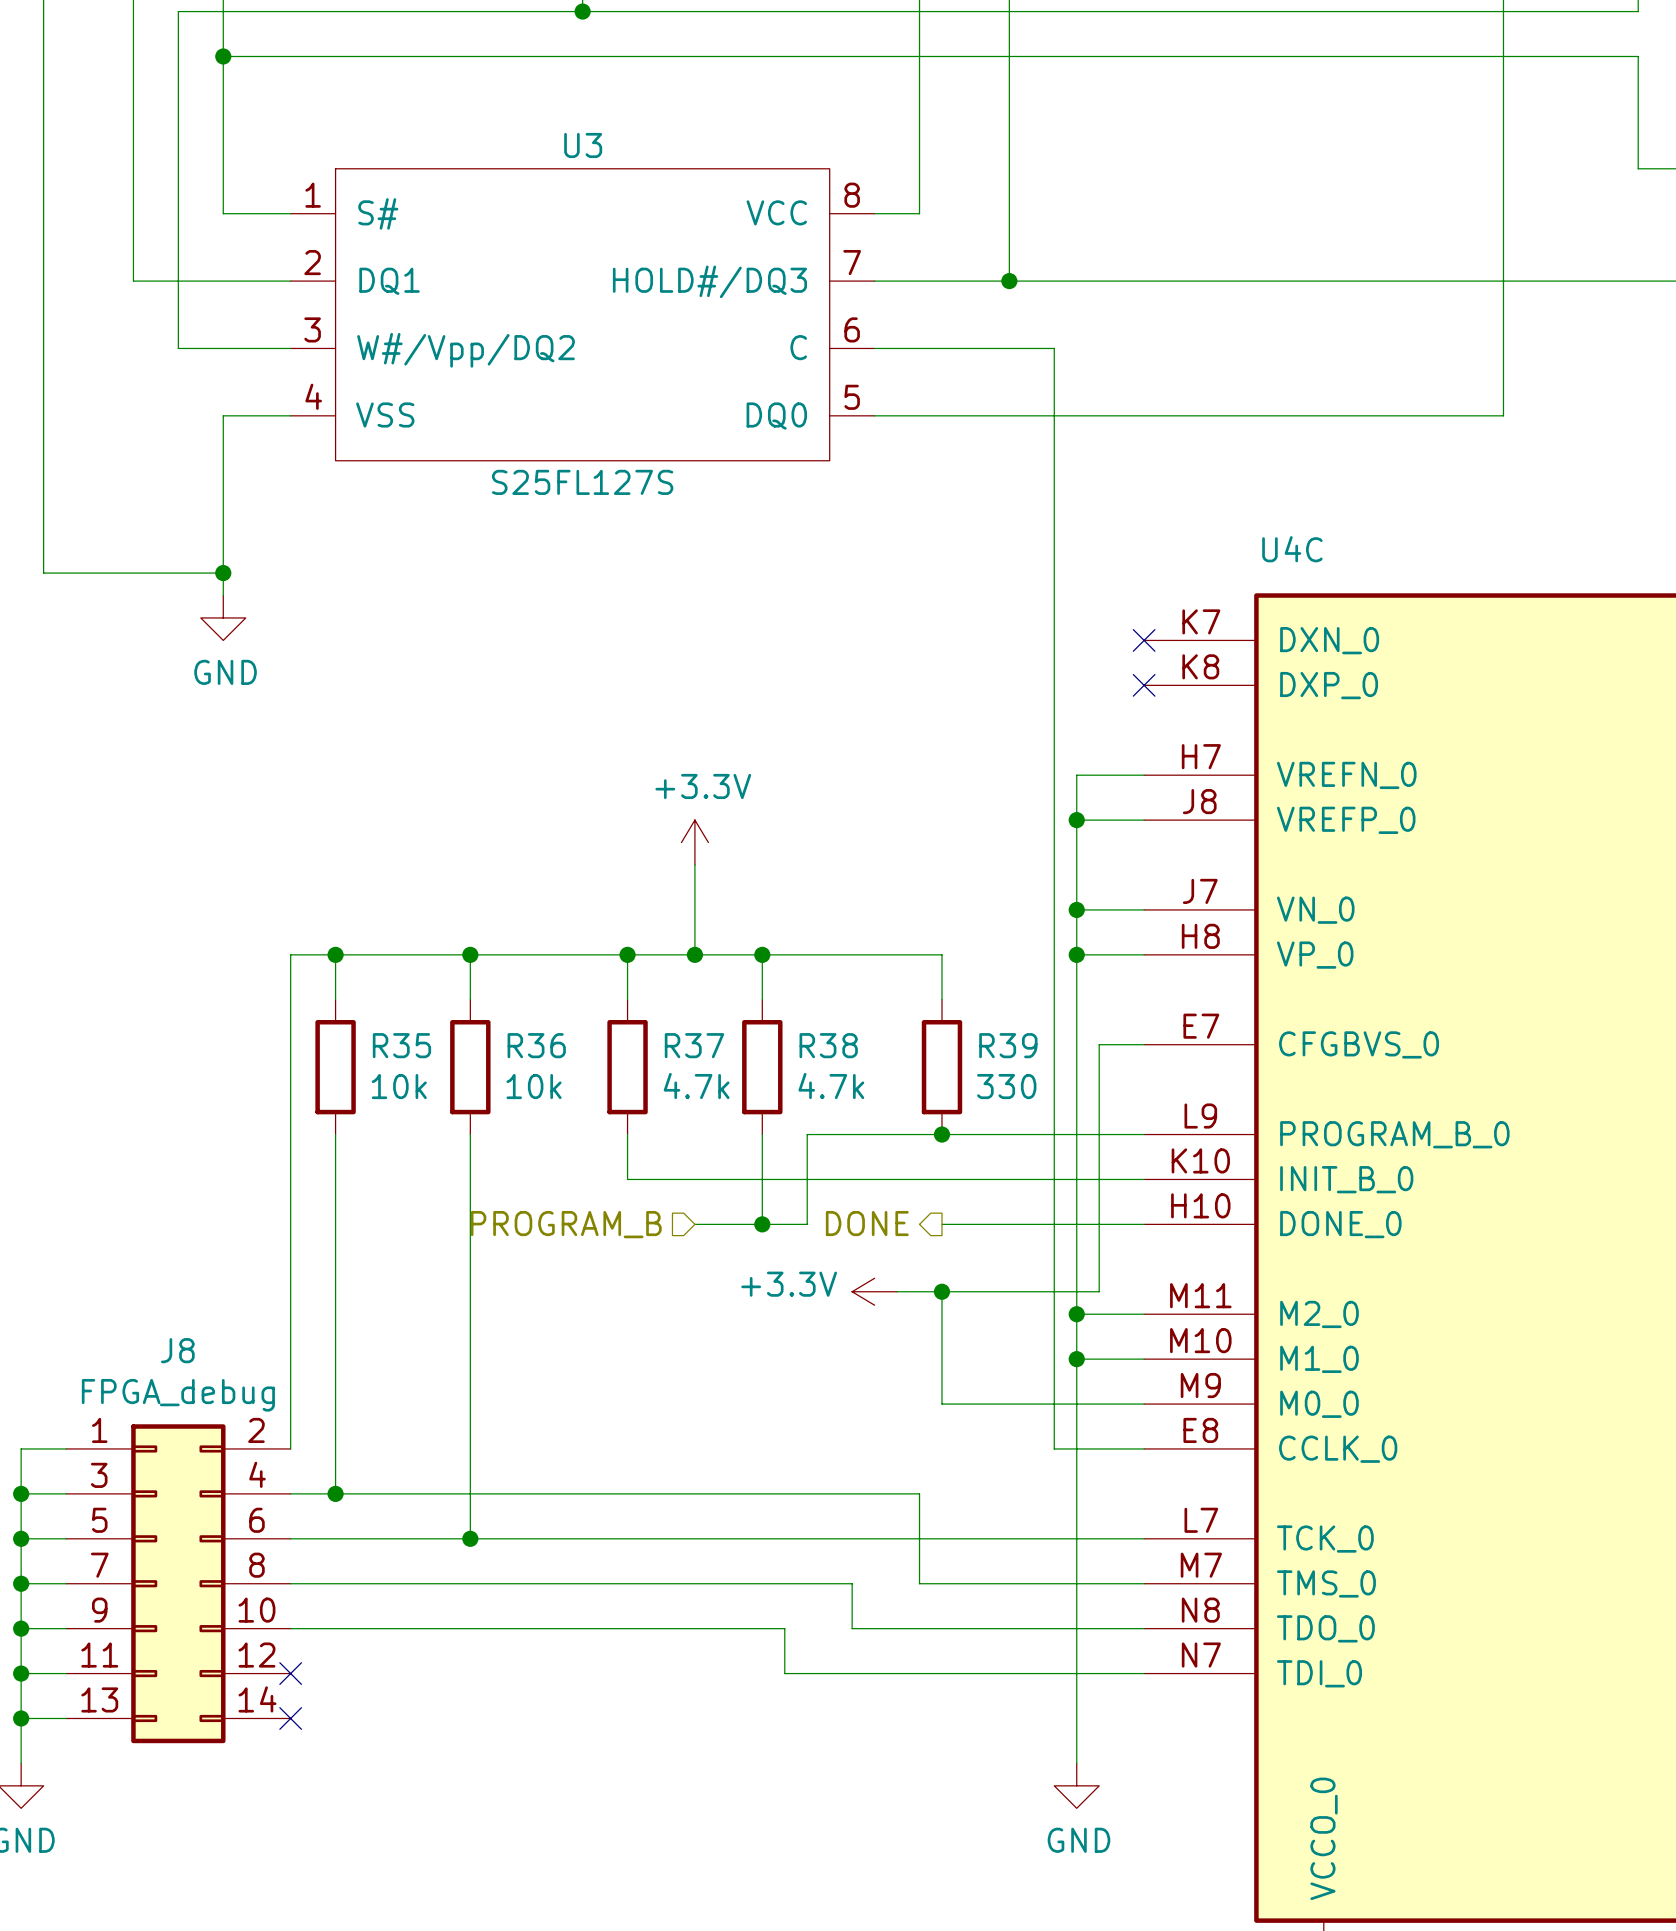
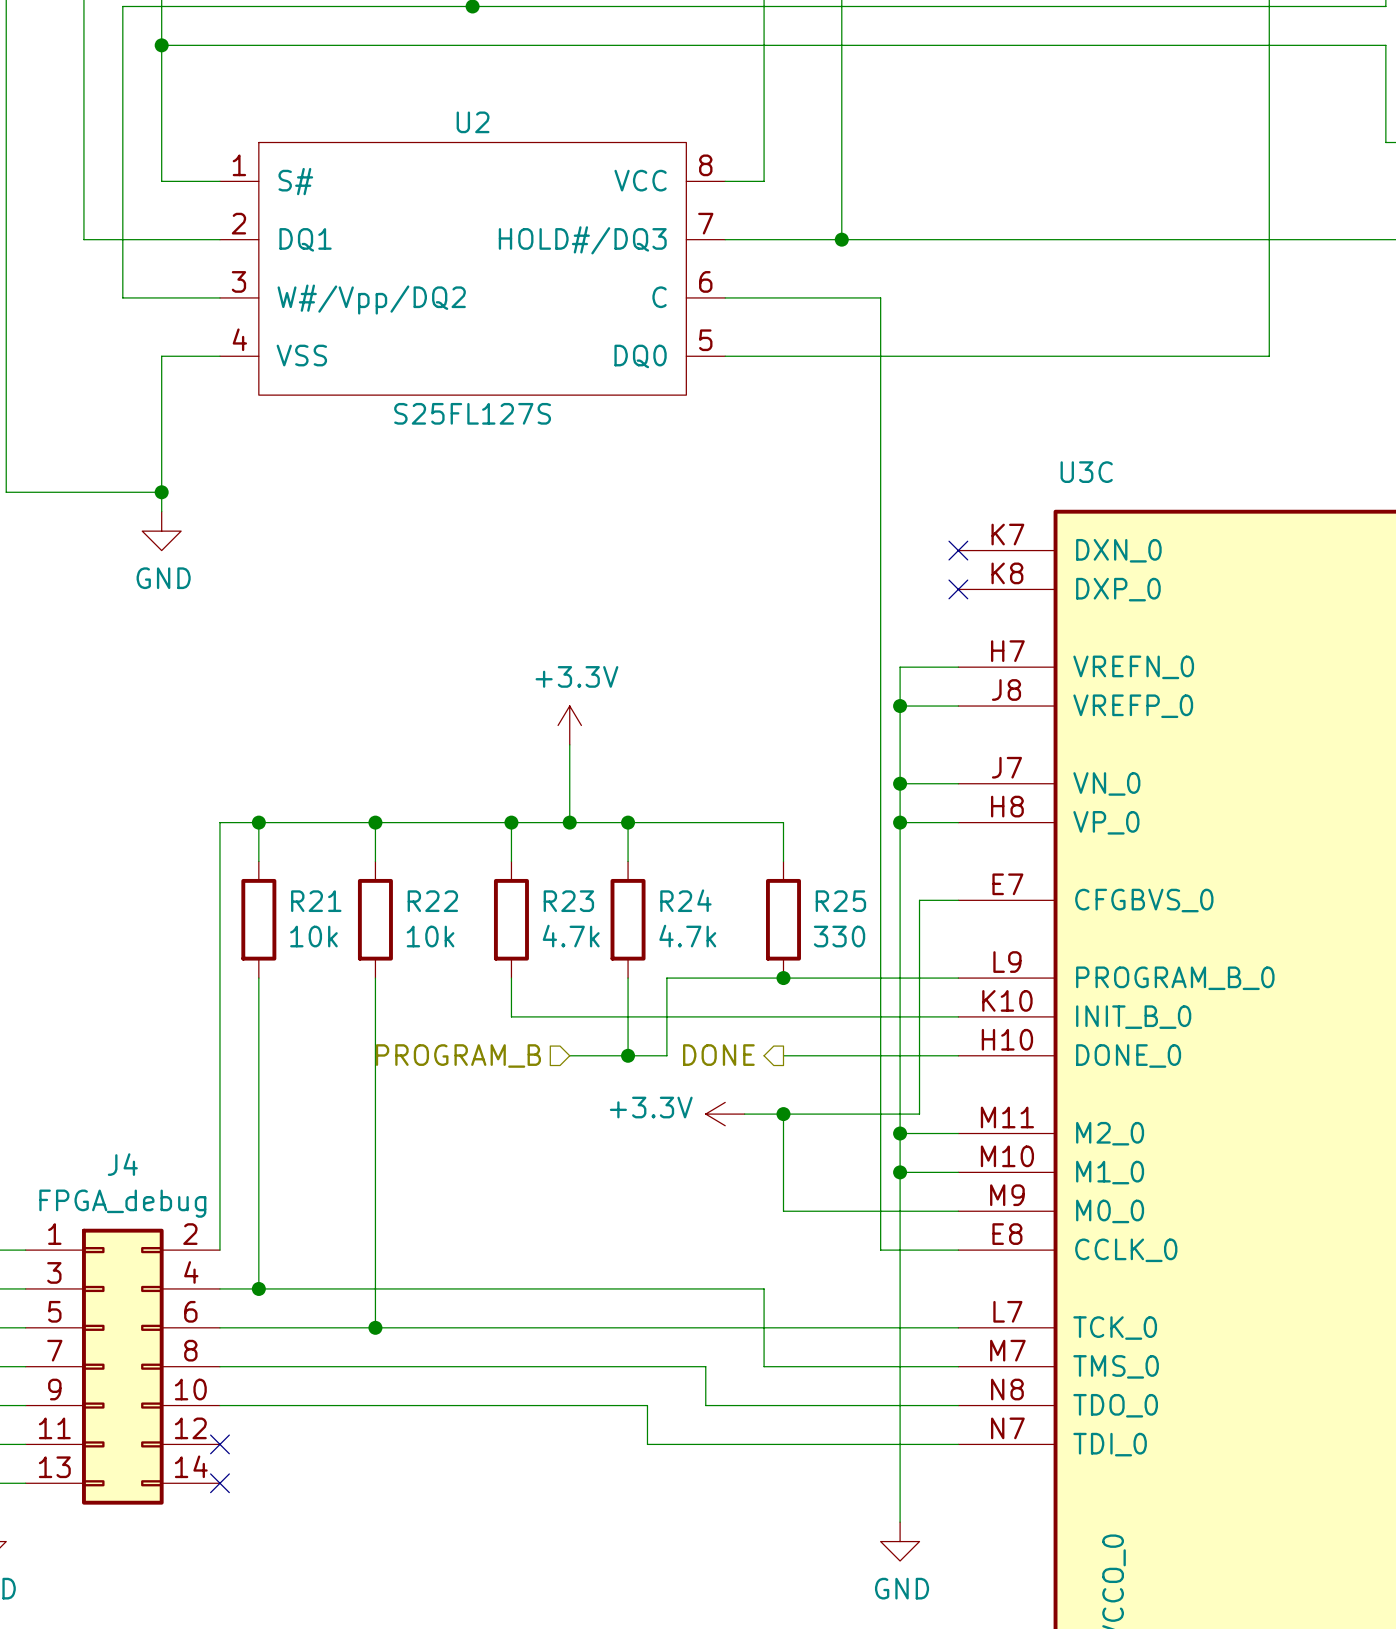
U3 name: U3 (583, 145) -> U2 (473, 122)
U4C name: U4C (1292, 549) -> U3C (1086, 472)
R35 name: R35 (401, 1045) -> R21 (316, 901)
R36 name: R36 (536, 1045) -> R22 (432, 901)
R37 name: R37 (694, 1045) -> R23 (568, 901)
R38 name: R38 (828, 1045) -> R24 (685, 900)
R39 name: R39 (1008, 1045) -> R25 (840, 901)
J8 name: J8 (177, 1350) -> J4 (122, 1164)

